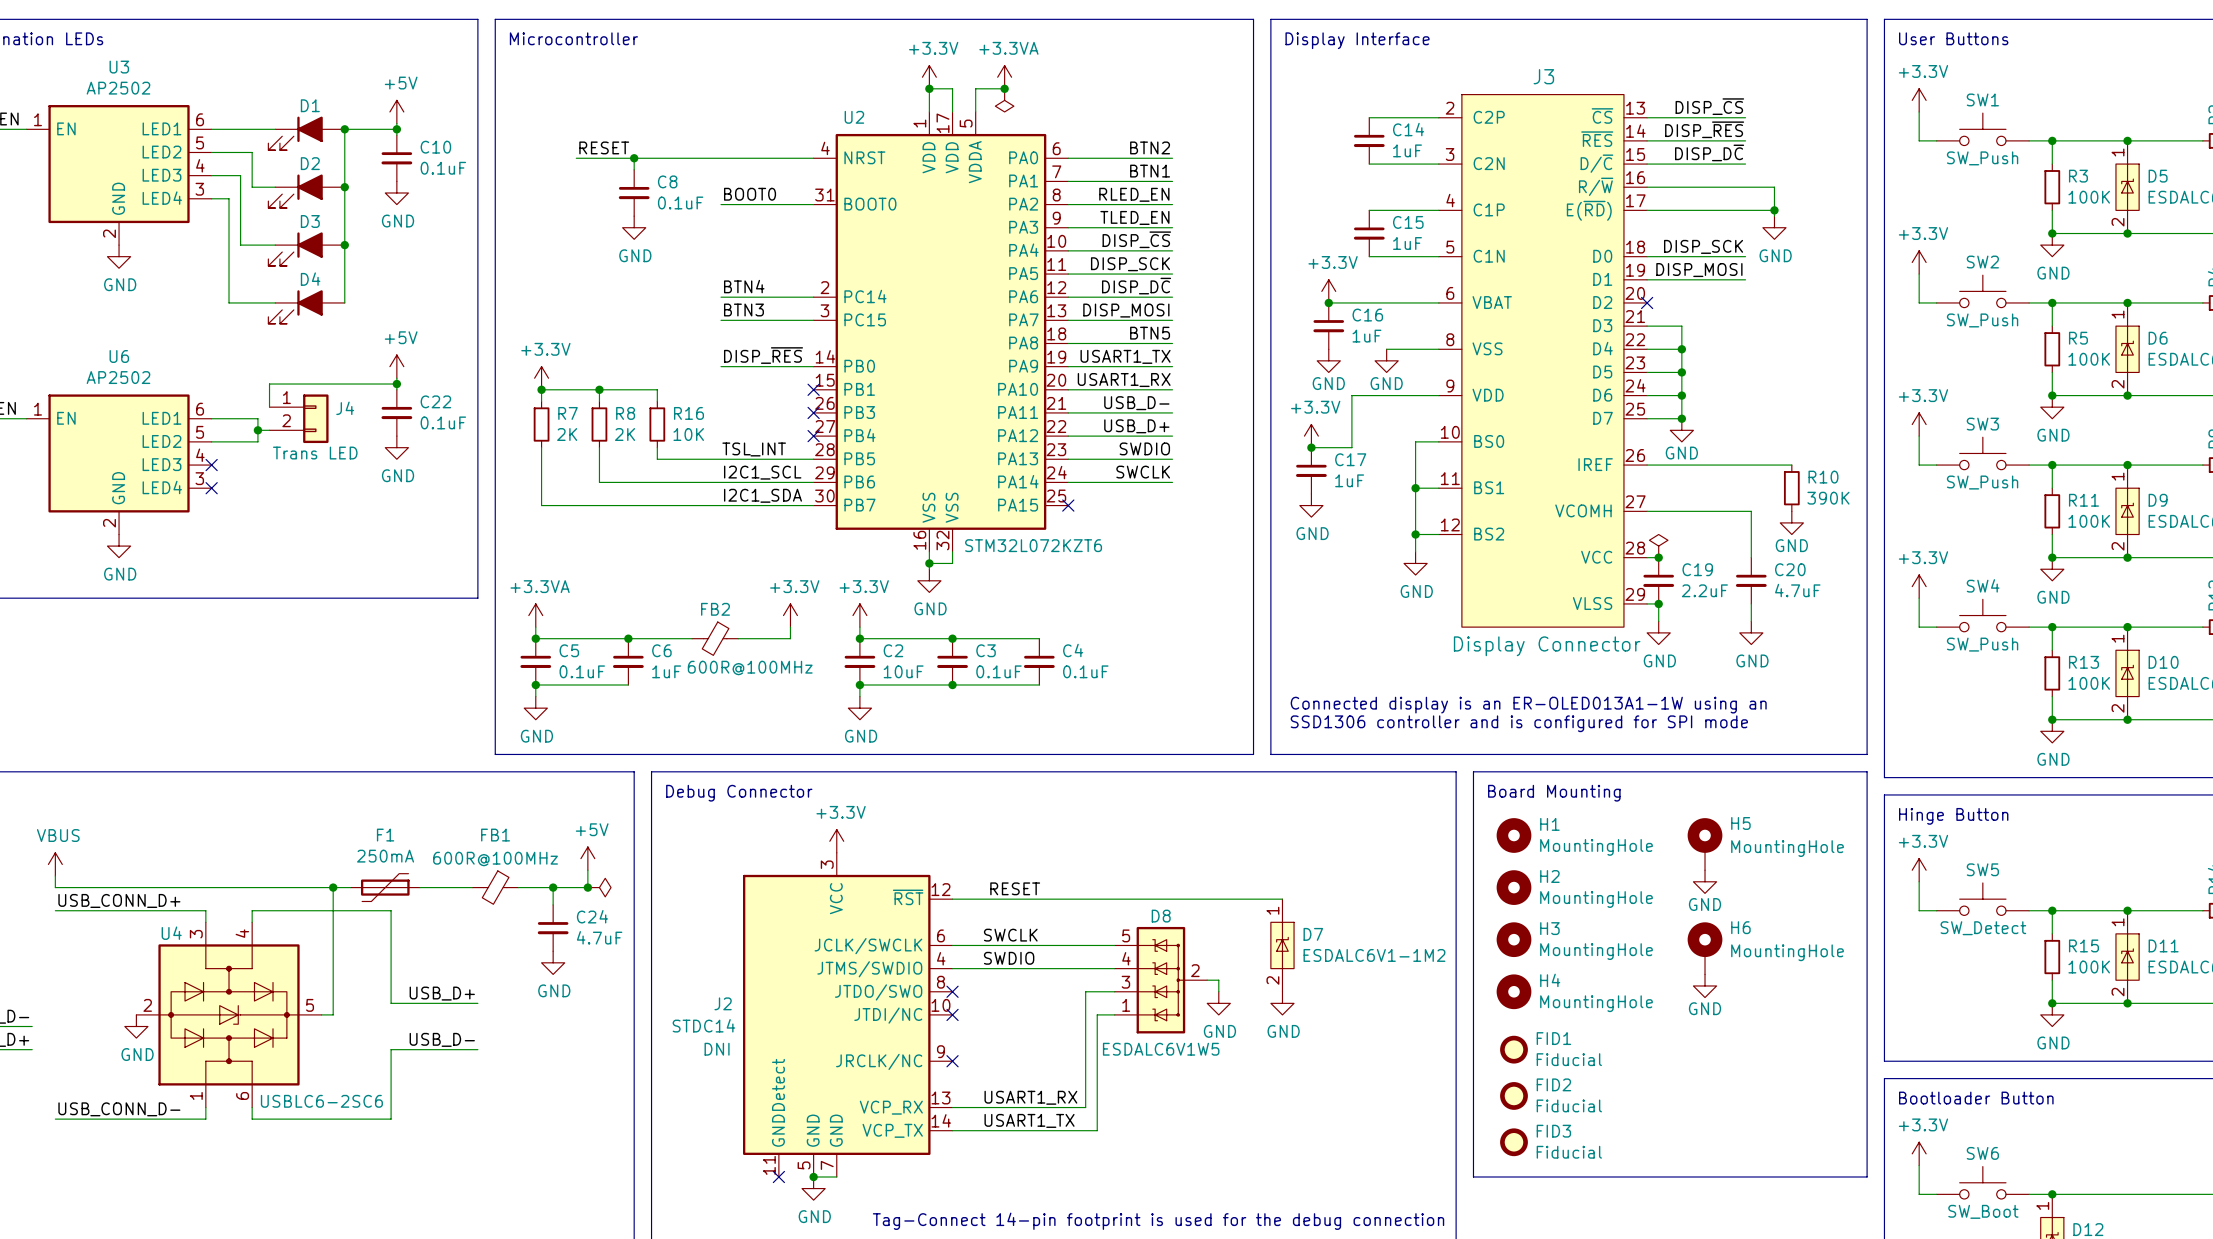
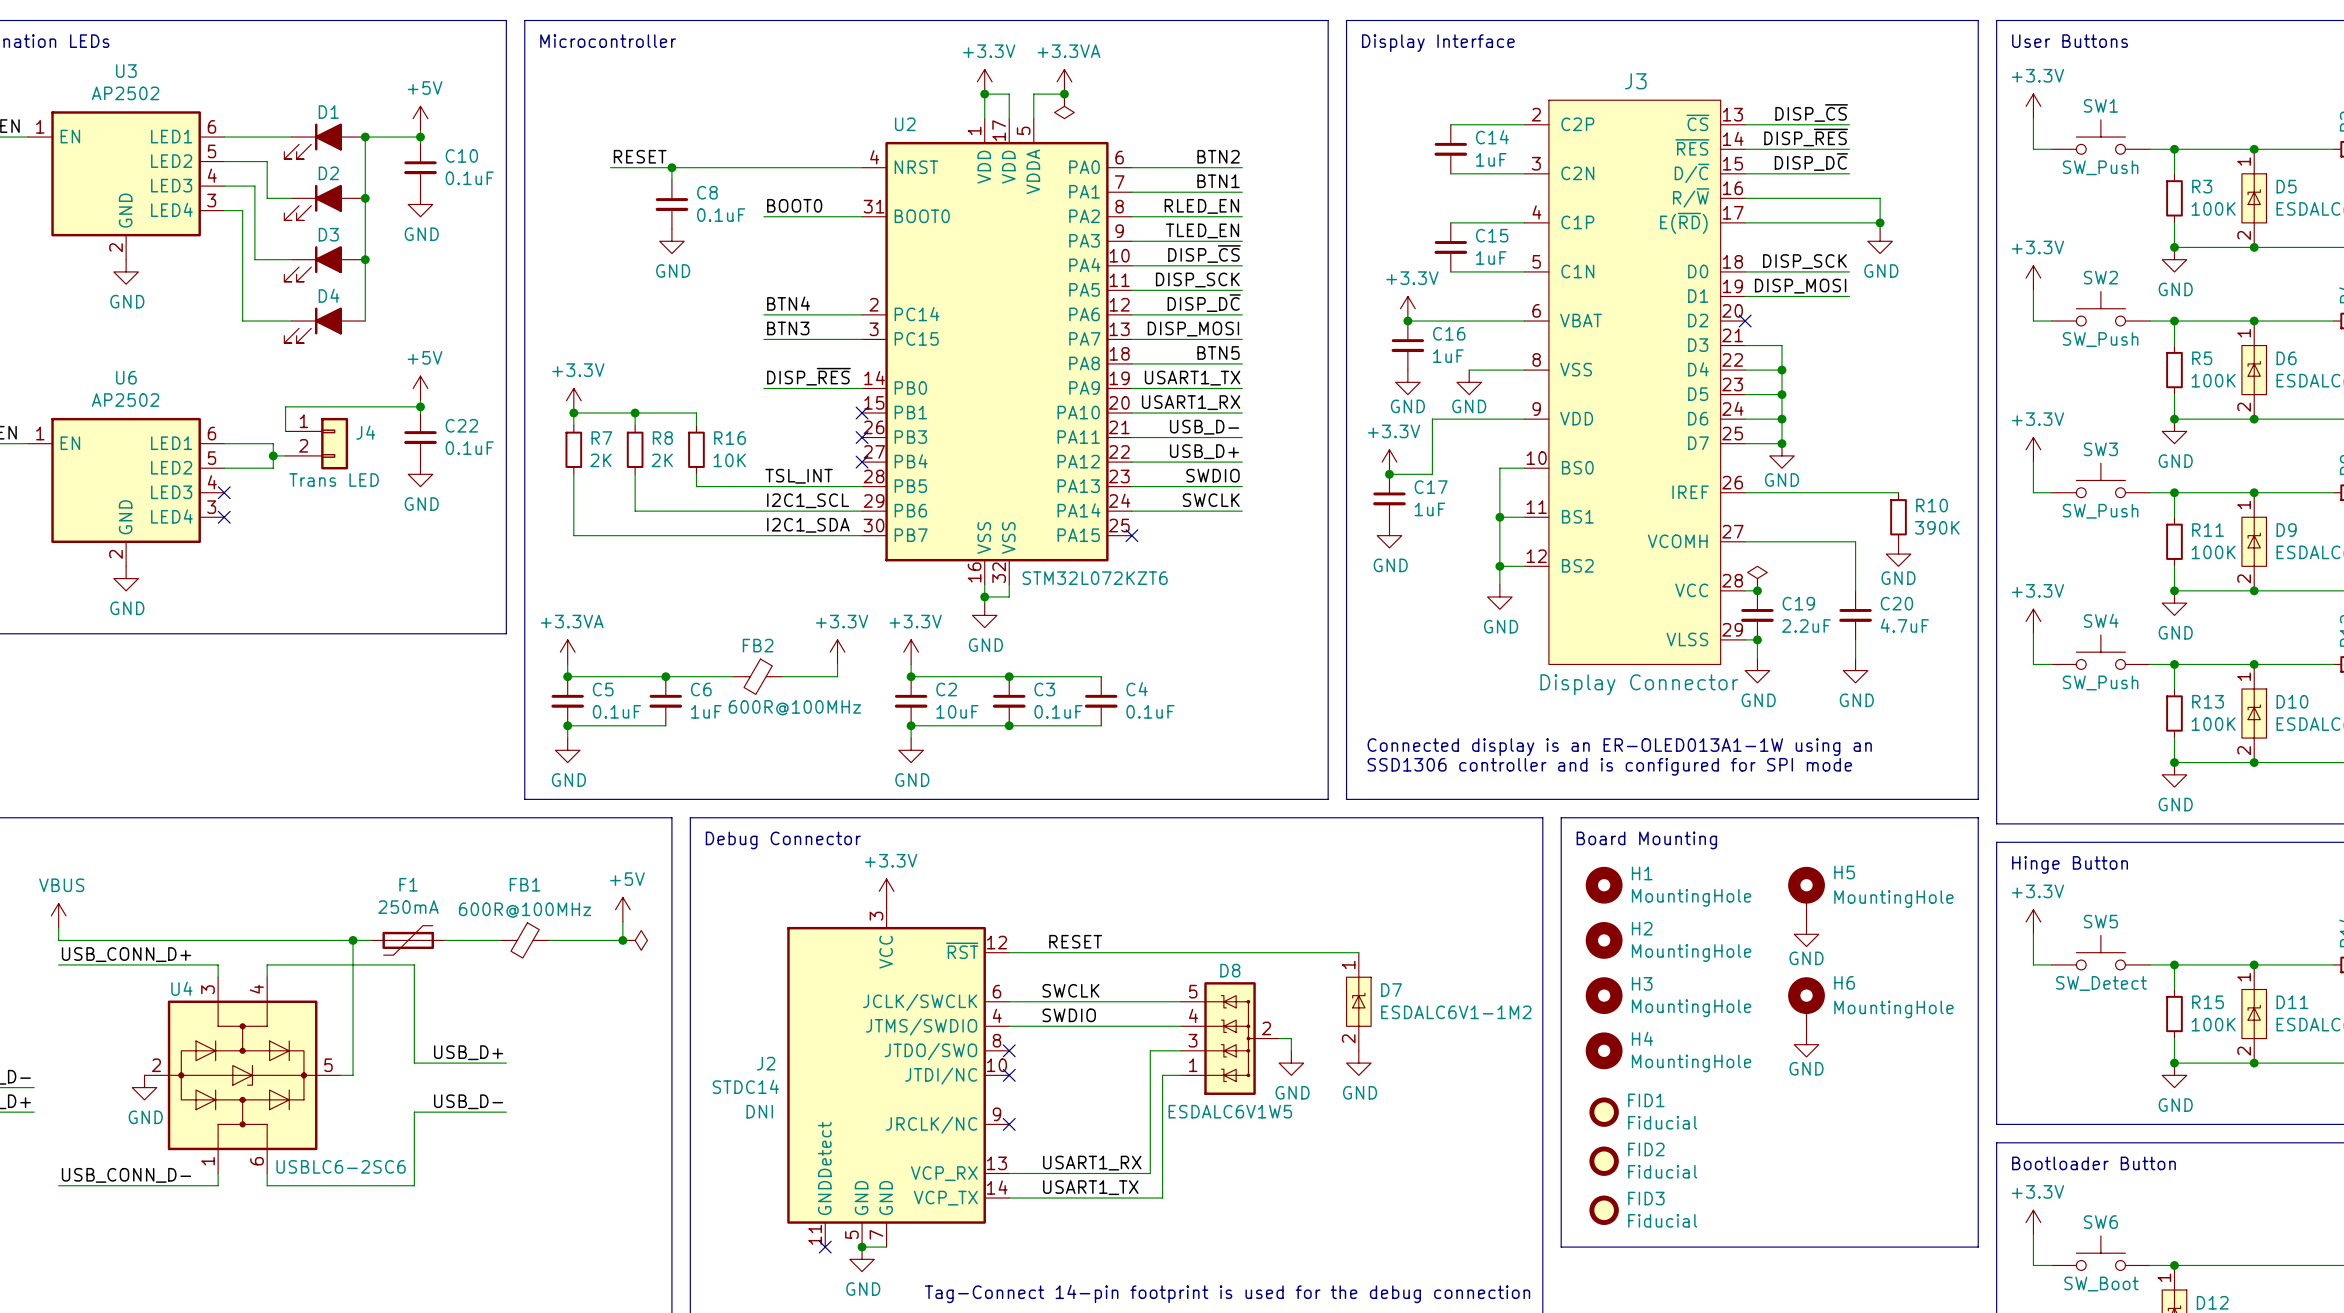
wire: (553, 887) (553, 904) -> none
junction: (553, 887) -> none
C24: 4.7uF (553, 928) -> none
power symbol: GND (553, 962) -> none

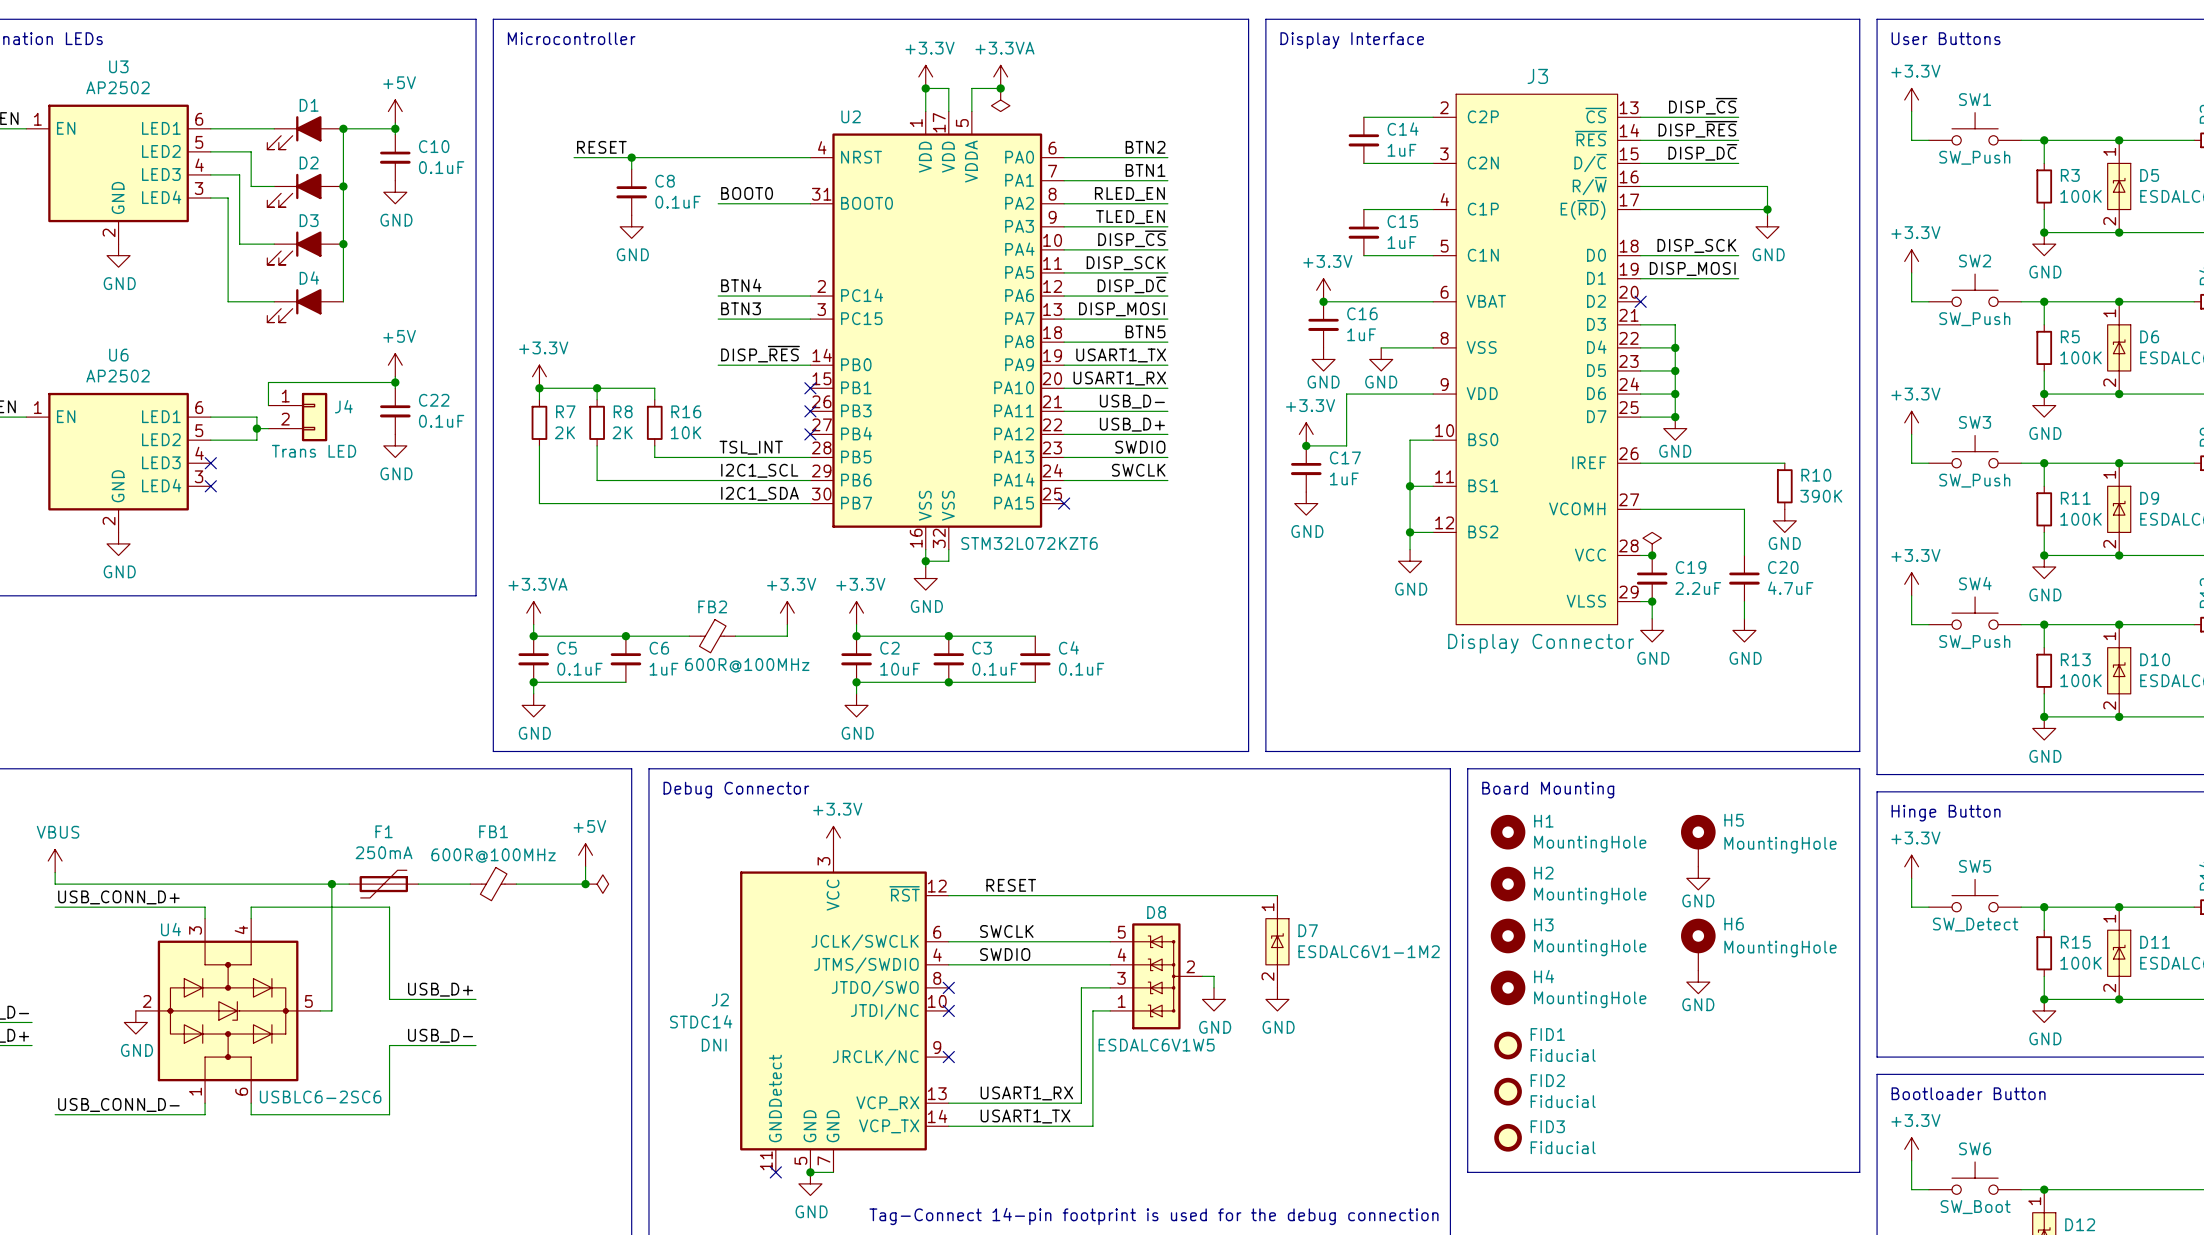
text: Connected display is an ER-OLED013A1-1W using an (1619, 747) -> none
text: SSD1306 controller and is configured for SPI mode (1609, 766) -> none

